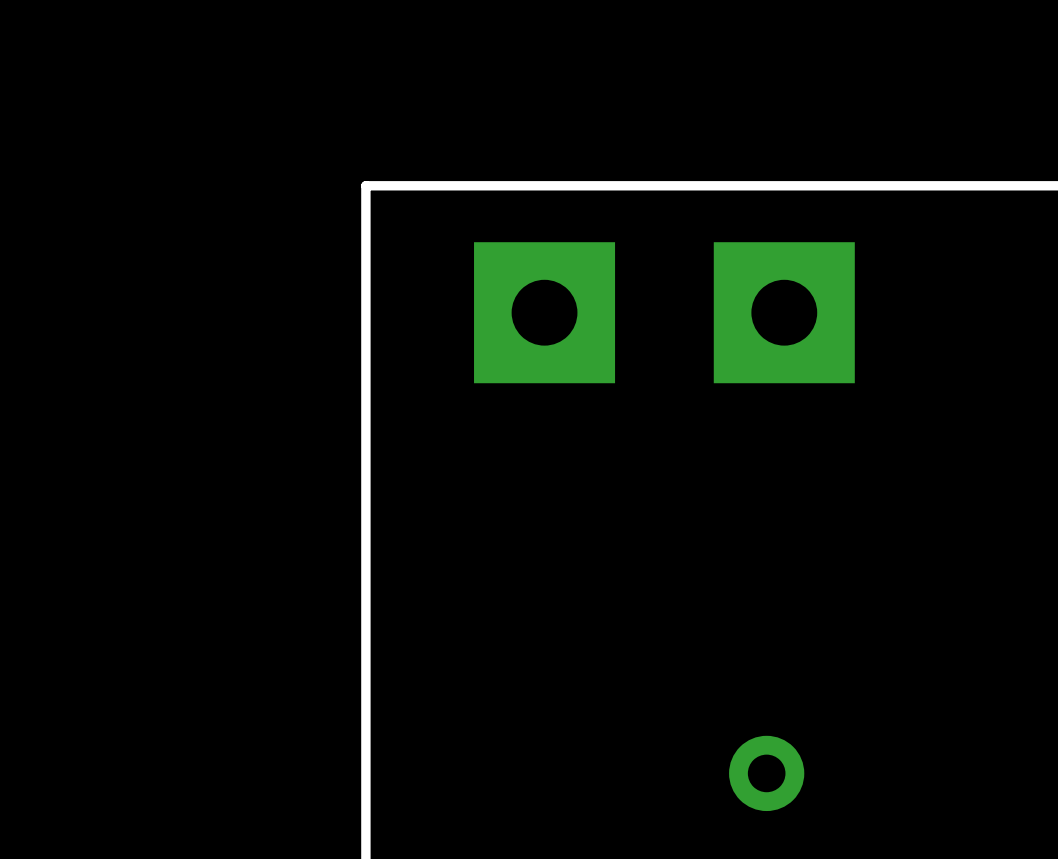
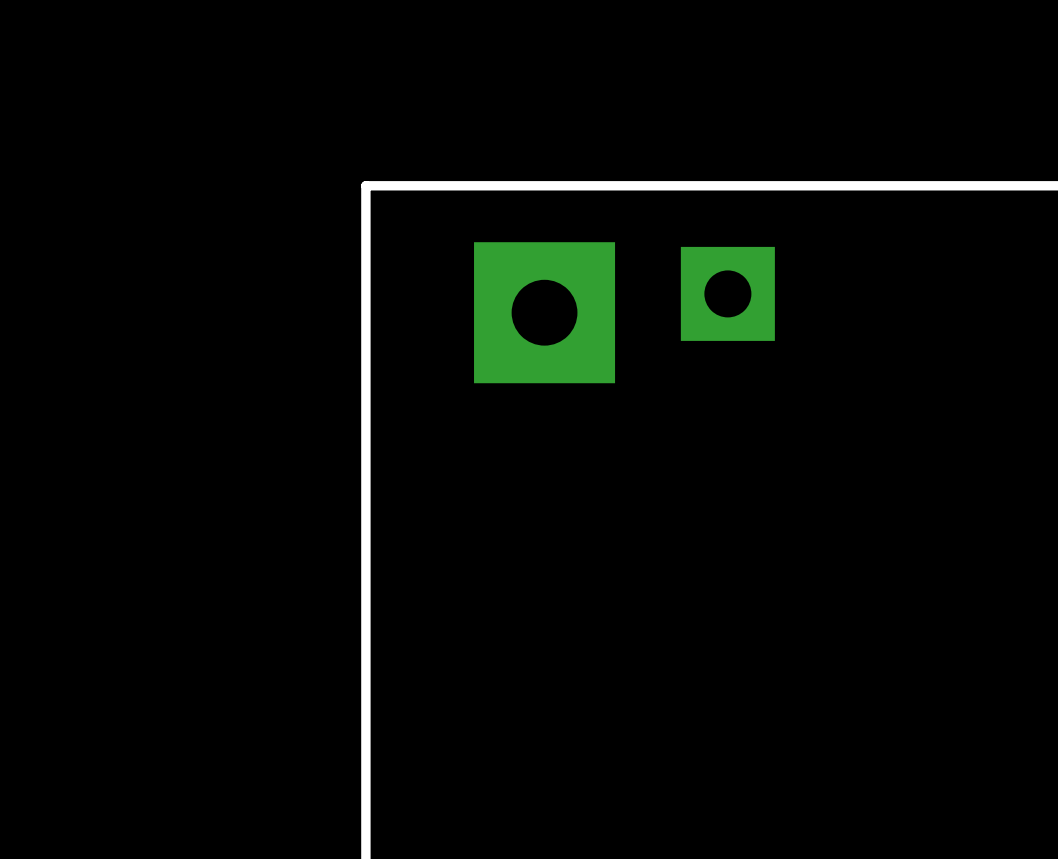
part footprint: [713, 242, 855, 384] -> [680, 246, 775, 341]
via: (766, 773) -> none

